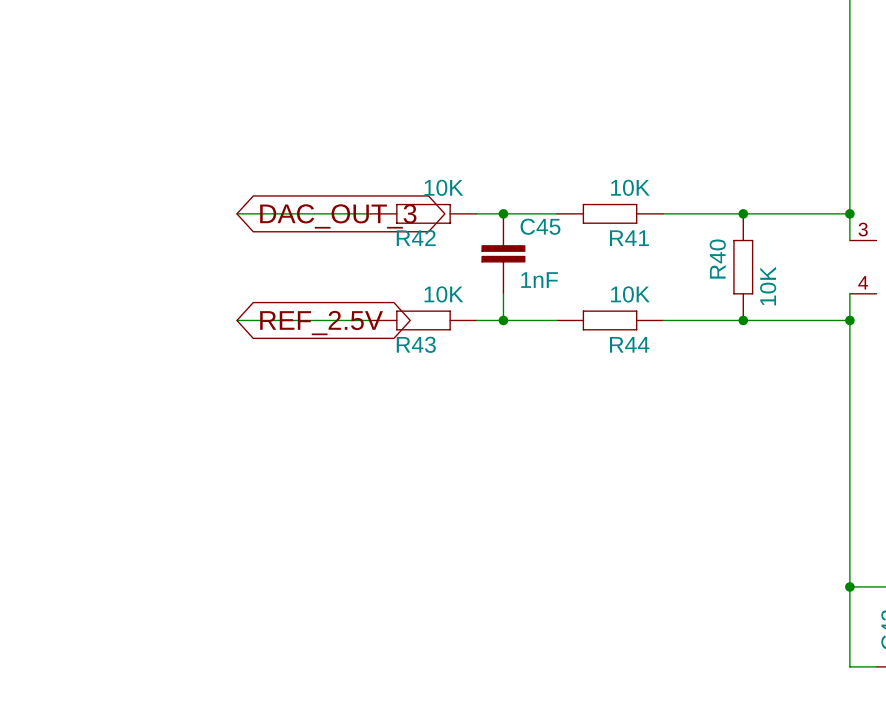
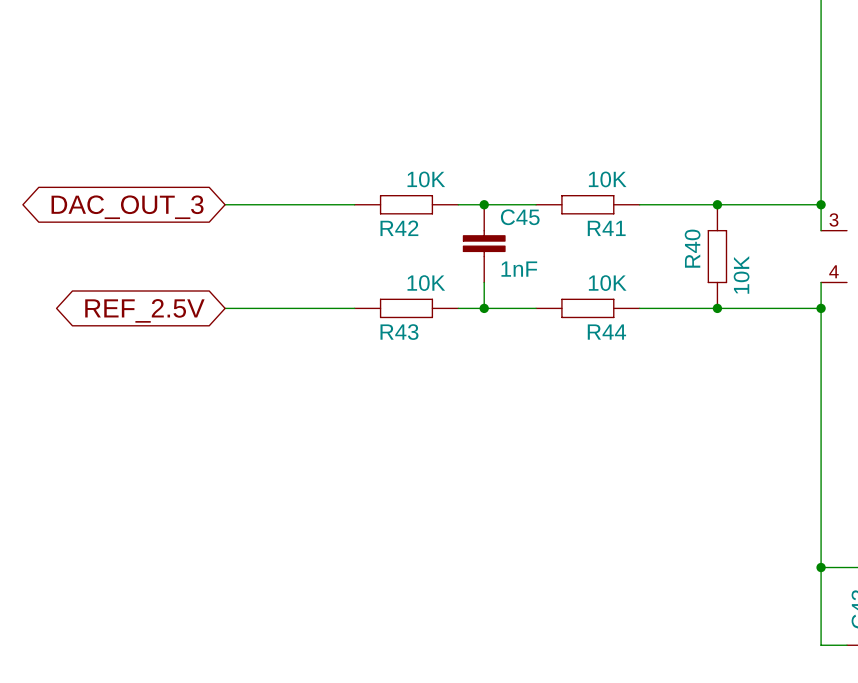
global label rotation: 0° (338, 216) -> 180° (127, 207)
global label rotation: 0° (321, 323) -> 180° (144, 310)

